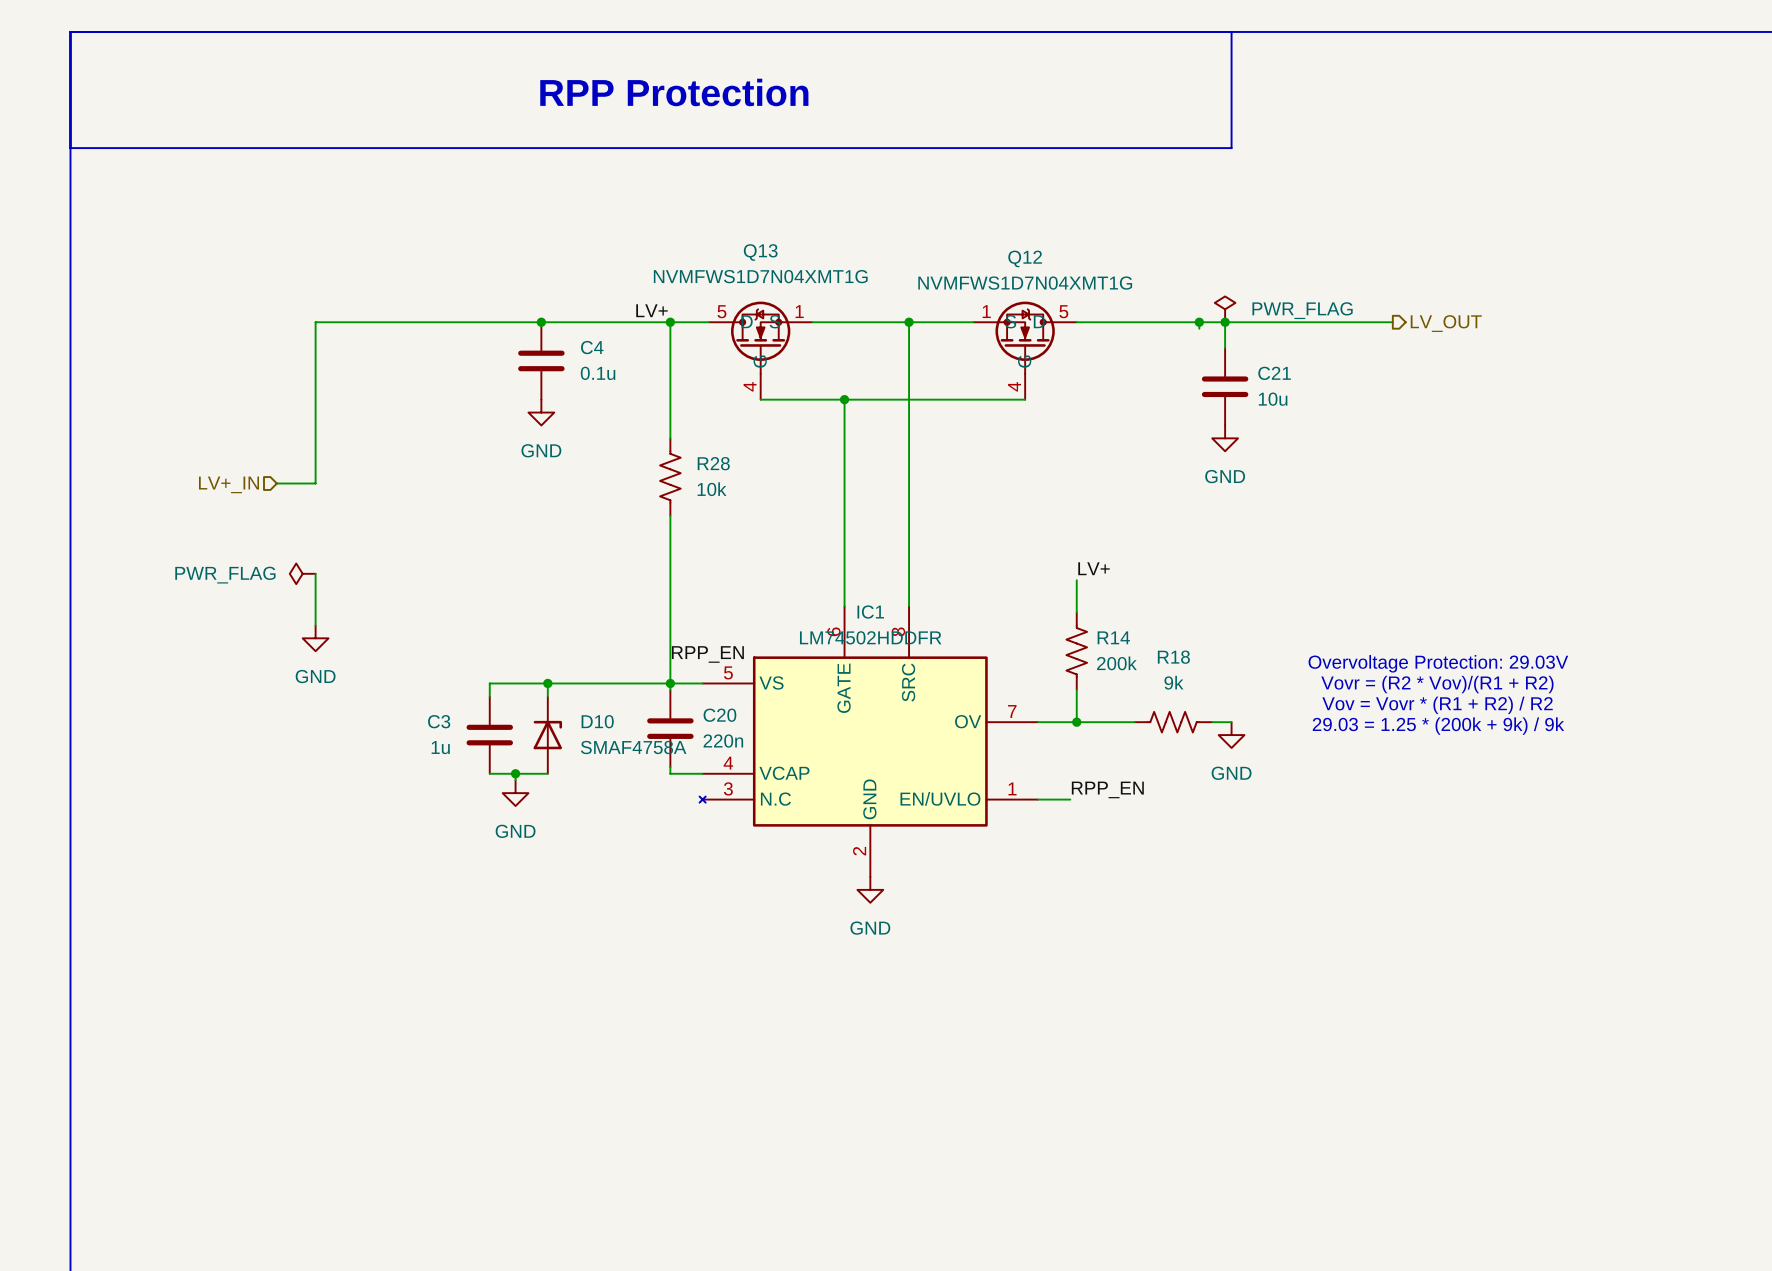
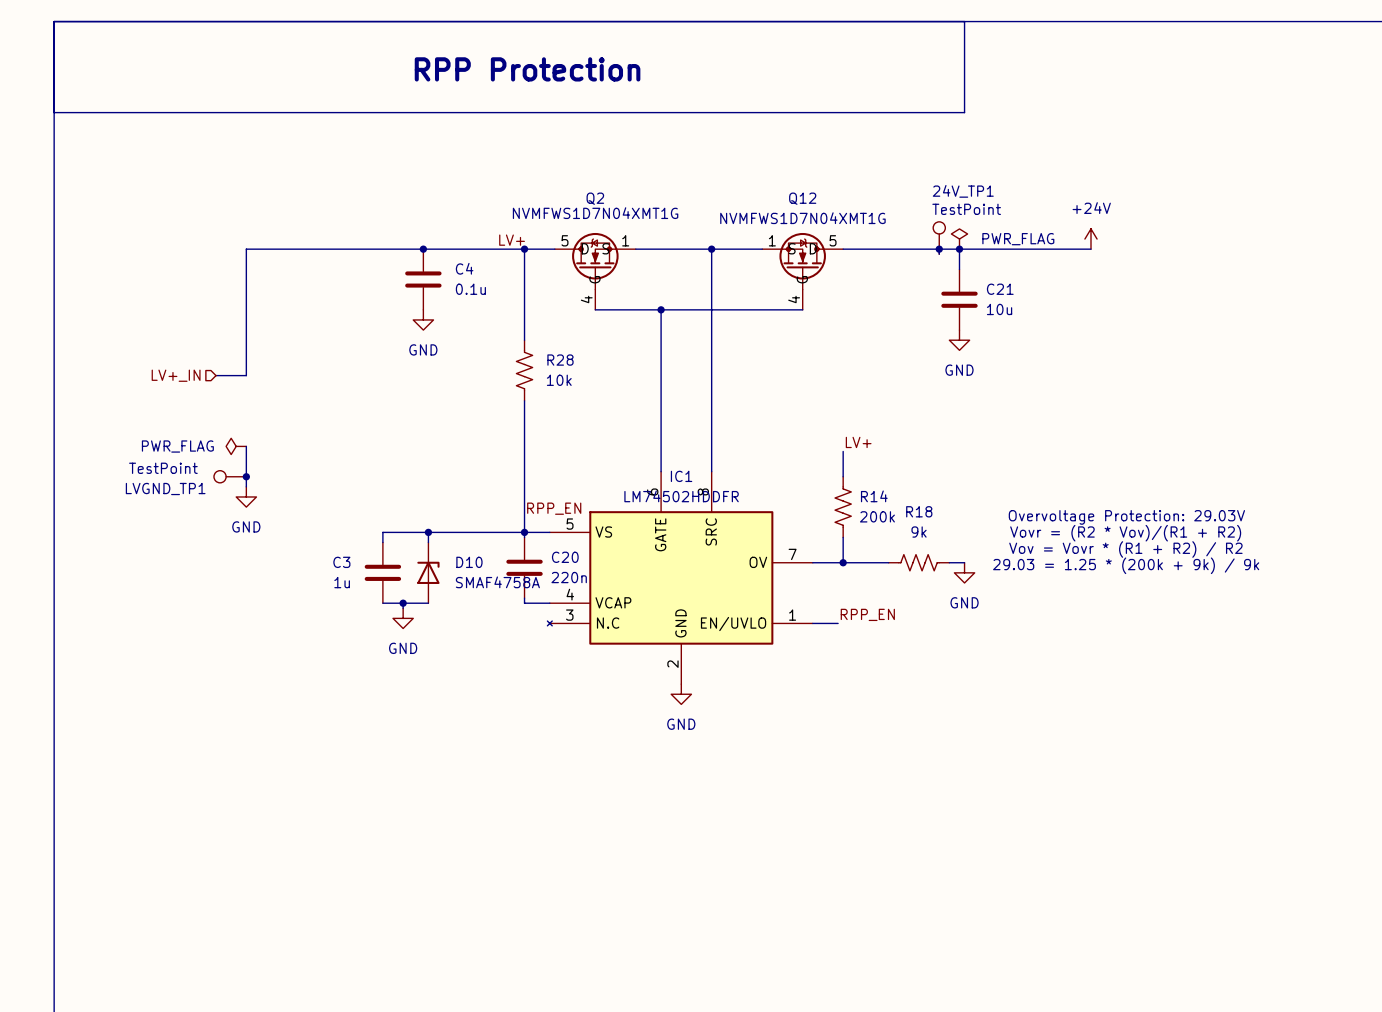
Q13 name: Q13 (760, 252) -> Q2 (595, 198)
24V_TP1: none -> TestPoint (939, 238)
power symbol: none -> +24V (1090, 239)
hierarchical label: LV_OUT (1446, 323) -> none
LVGND_TP1: none -> TestPoint (230, 476)
junction: none -> (246, 476)

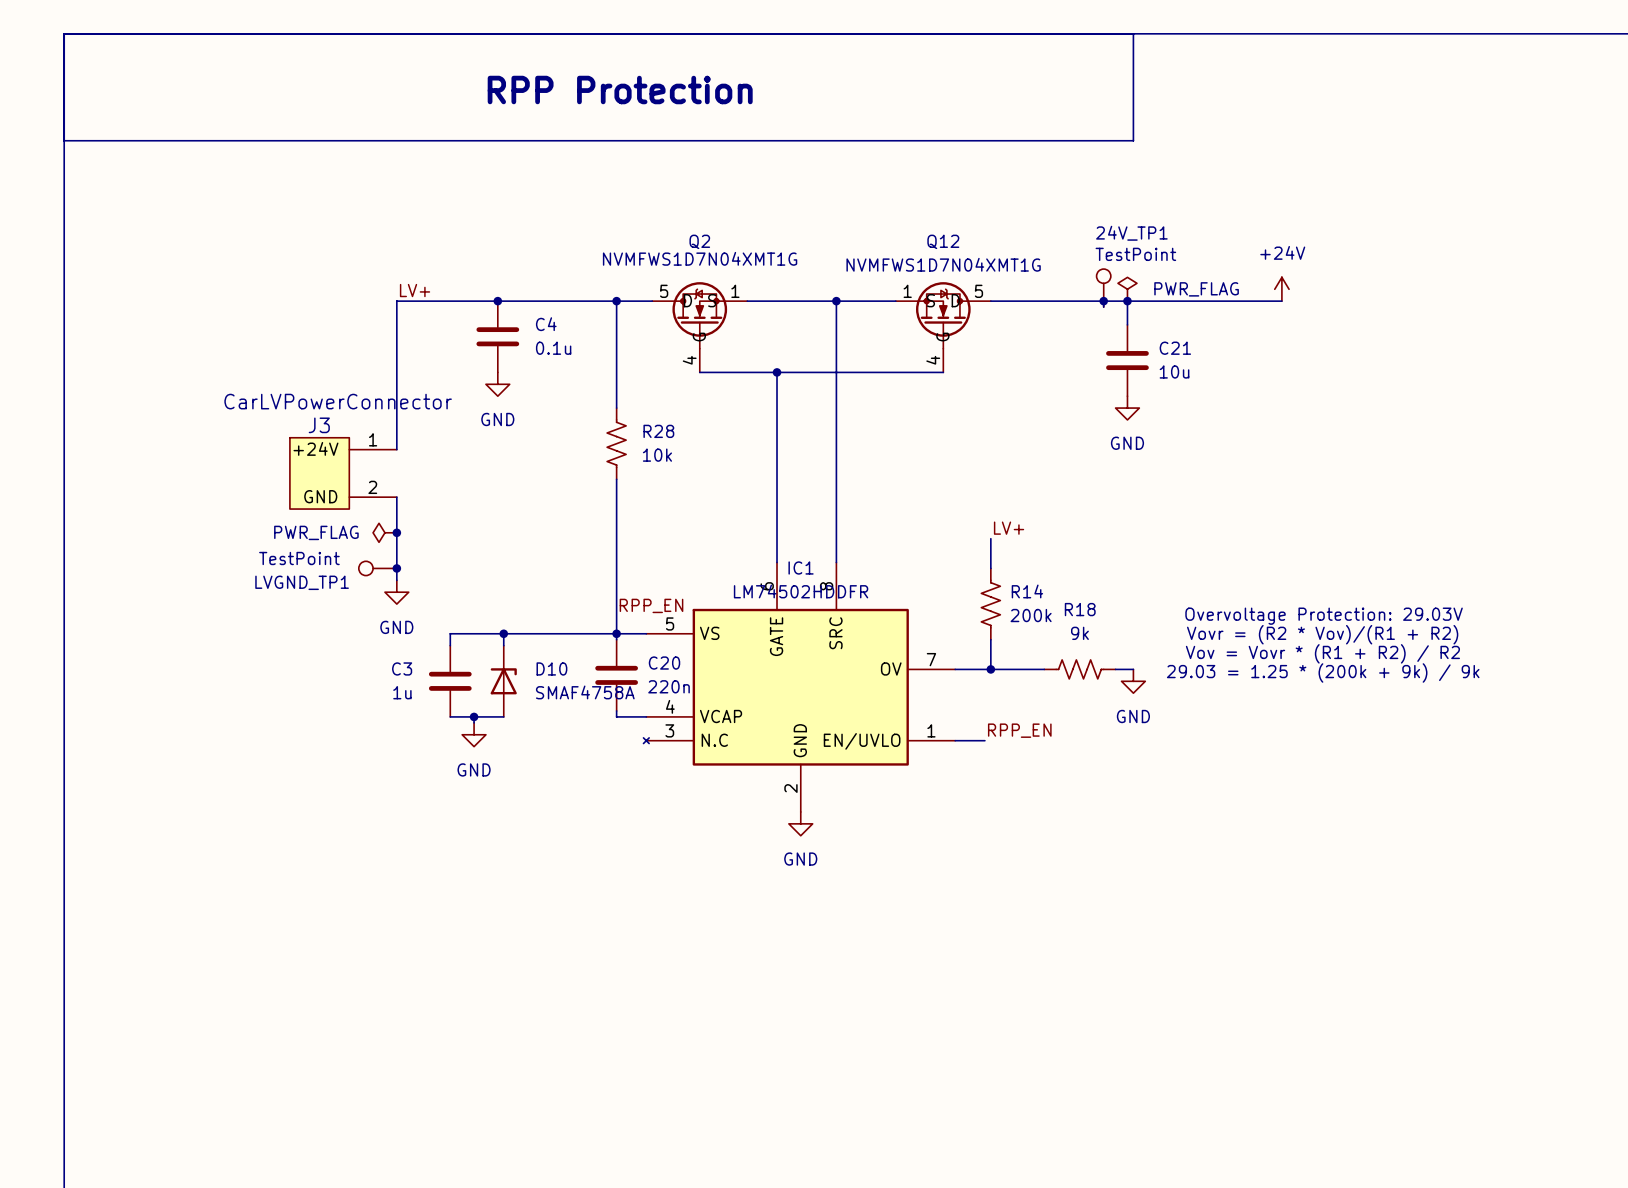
label position: LV+ (512, 240) -> LV+ (415, 290)
wire: (337, 249) (246, 249) (246, 375) (216, 375) -> (396, 301) (396, 449)
hierarchical label: LV+_IN (176, 375) -> none
J3: none -> CarLVPowerConnector (343, 473)
wire: none -> (396, 497) (396, 580)
power symbol position: PWR_FLAG (236, 446) -> PWR_FLAG (384, 532)
wire: (246, 446) (246, 486) -> none
junction: none -> (396, 532)
LVGND_TP1 position: (230, 476) -> (377, 568)
junction: (246, 476) -> none
junction: none -> (396, 568)
power symbol position: GND (246, 496) -> GND (396, 592)

